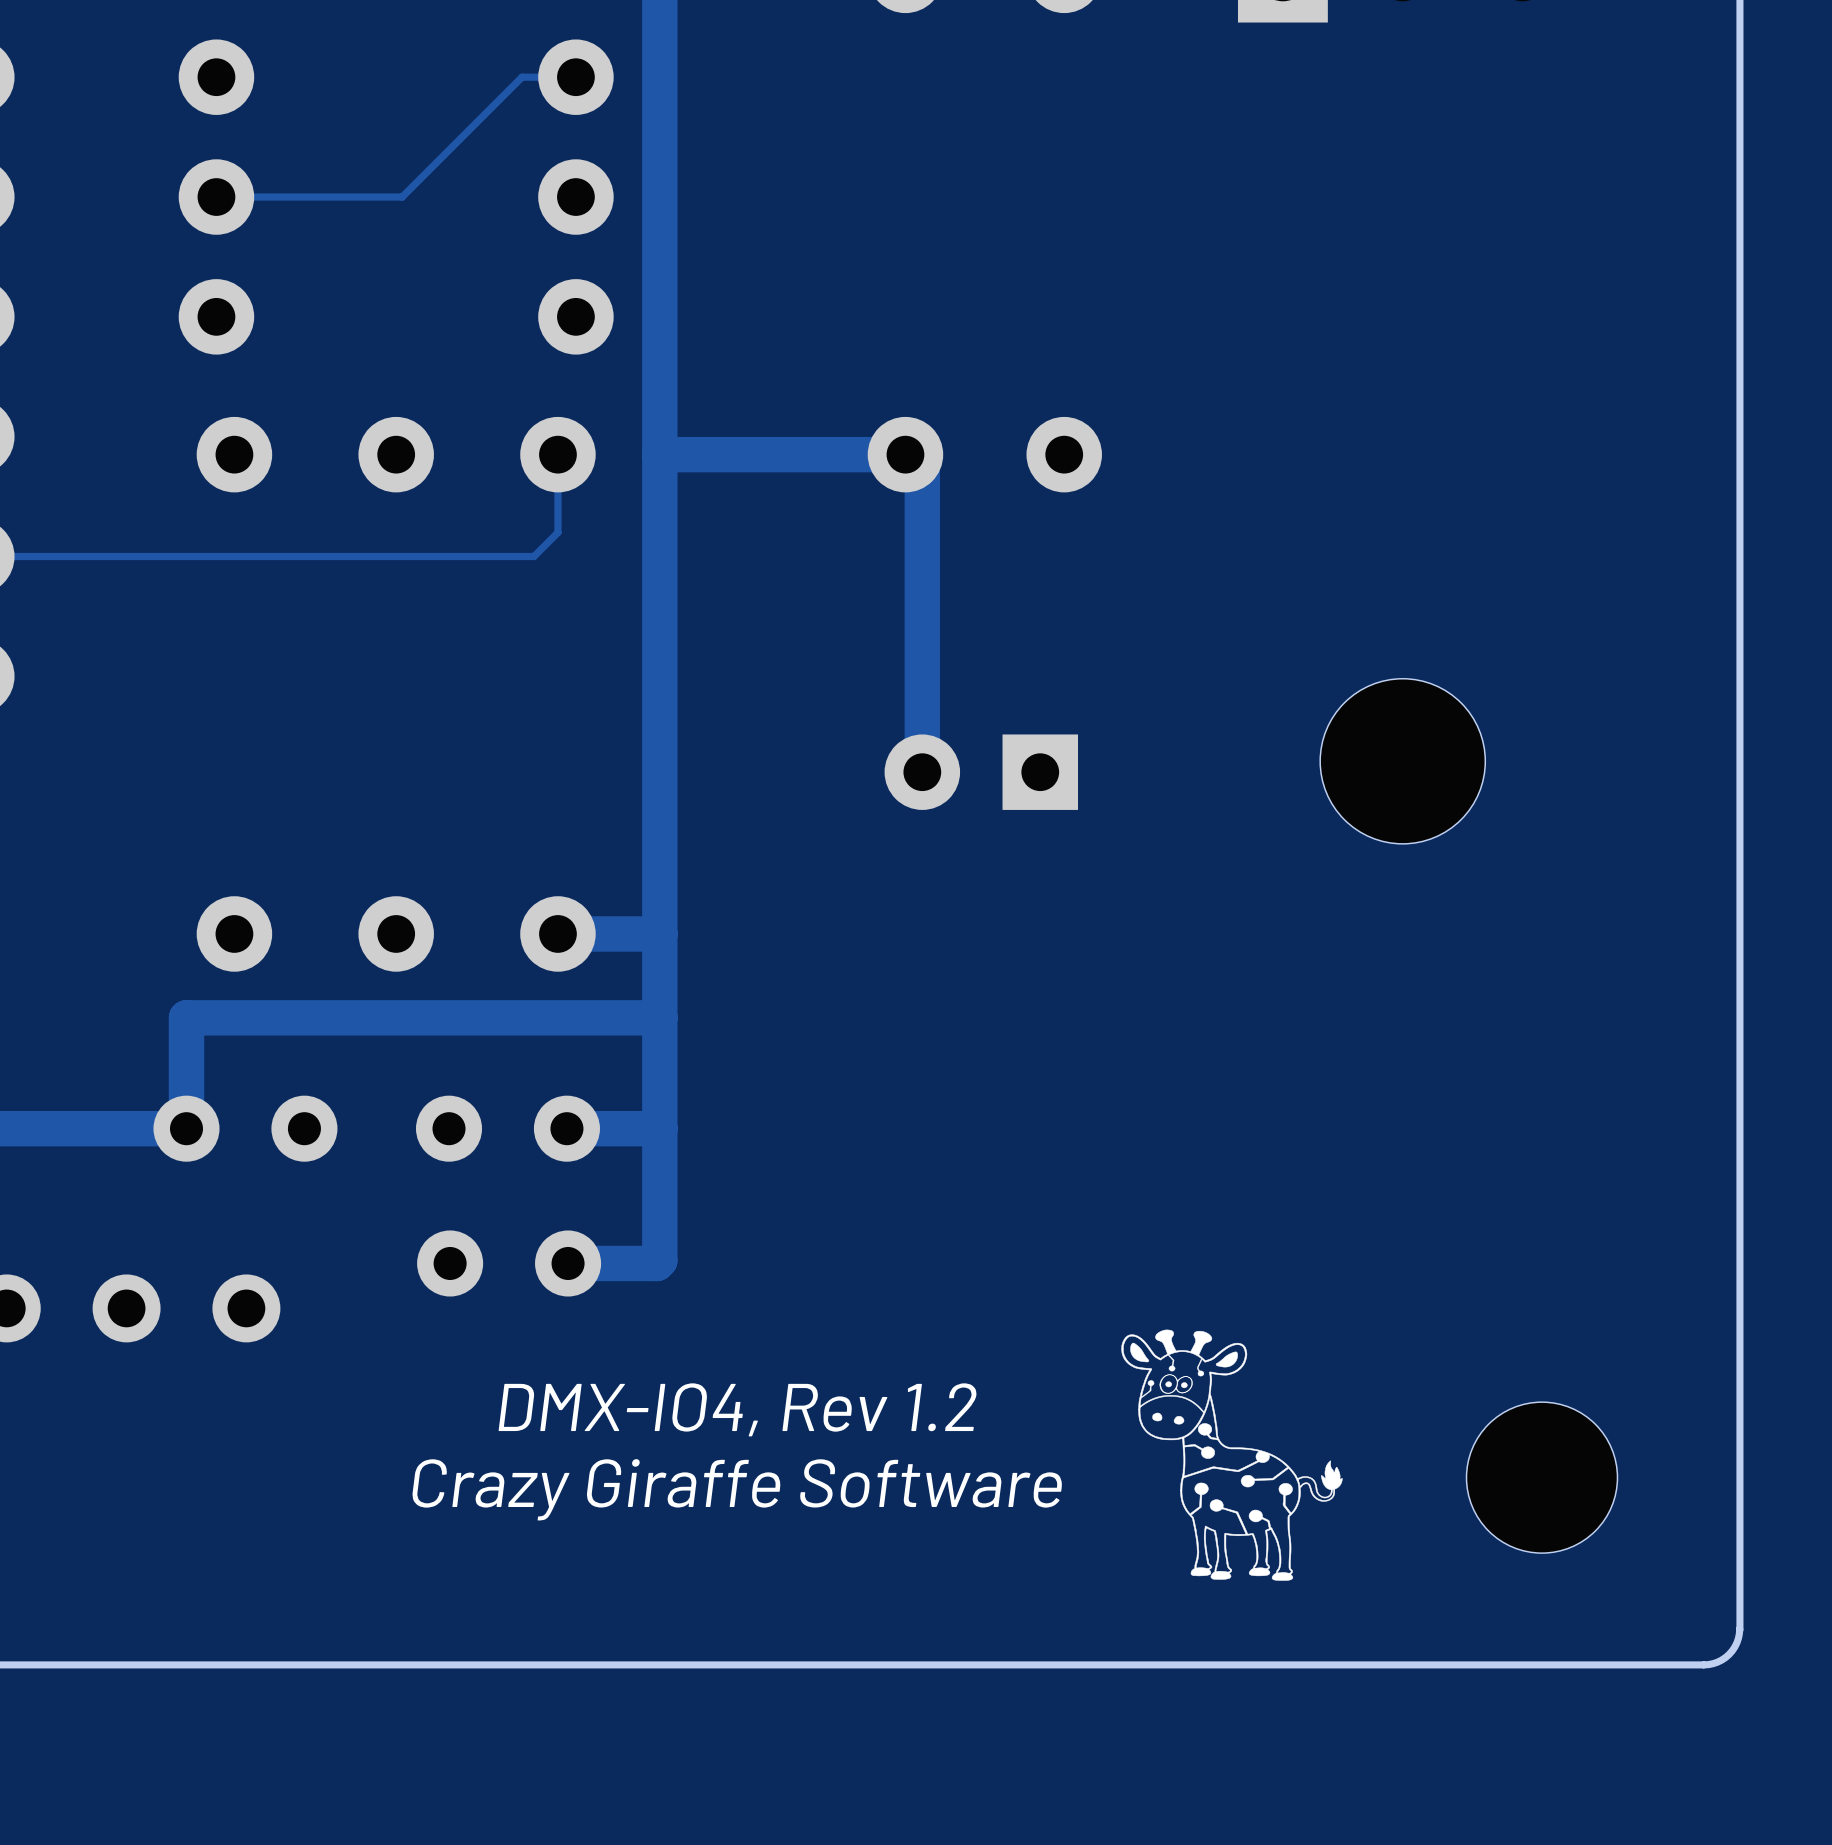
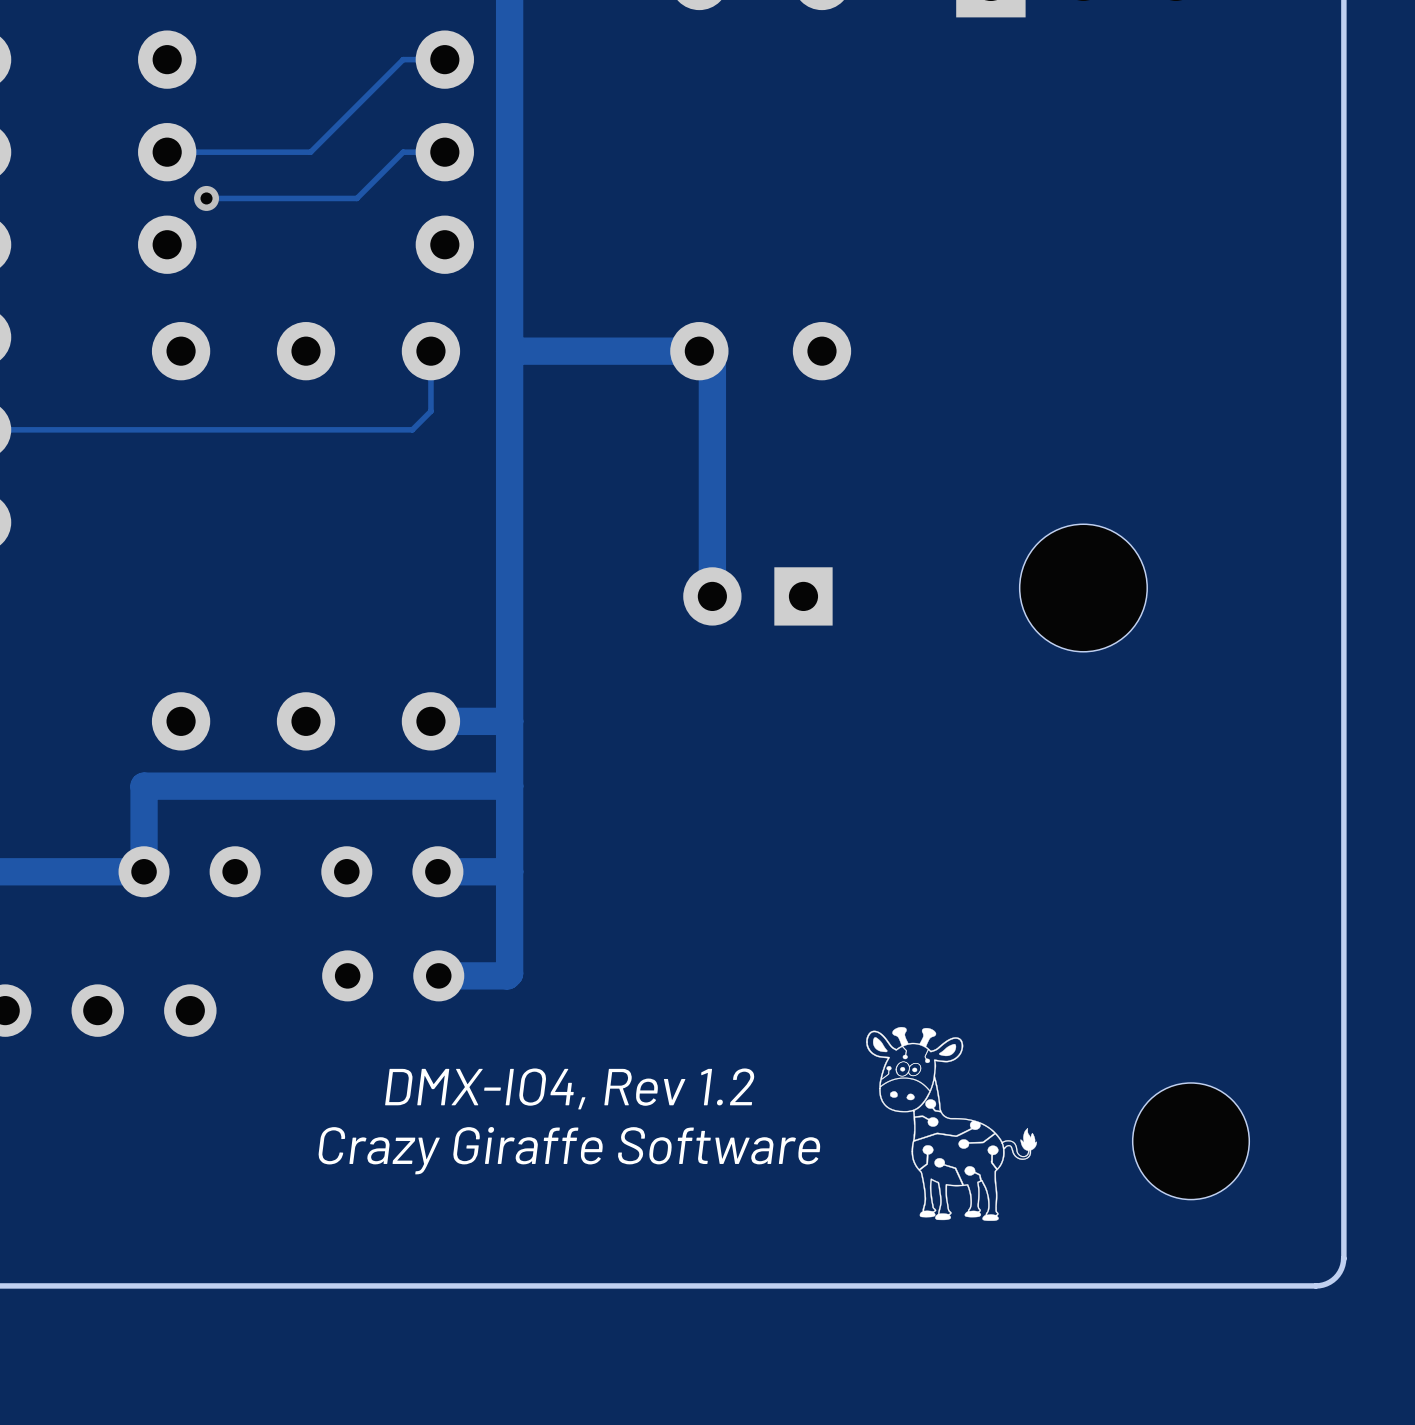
track: none -> (444, 152) (403, 152) (356, 198) (206, 198)
via: none -> (206, 198)

